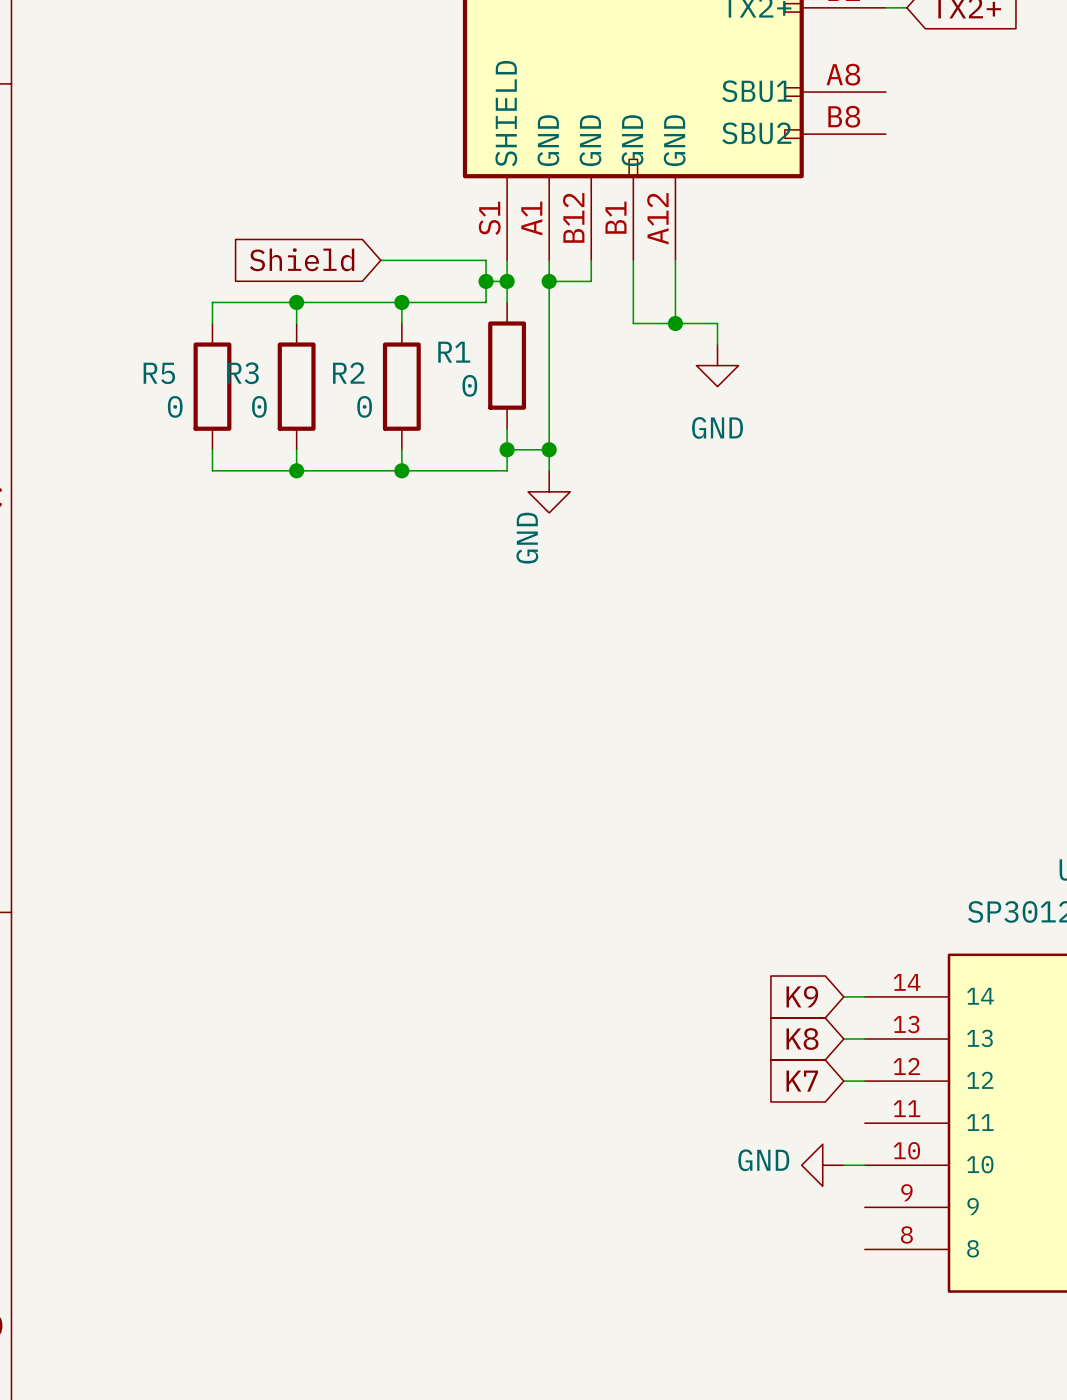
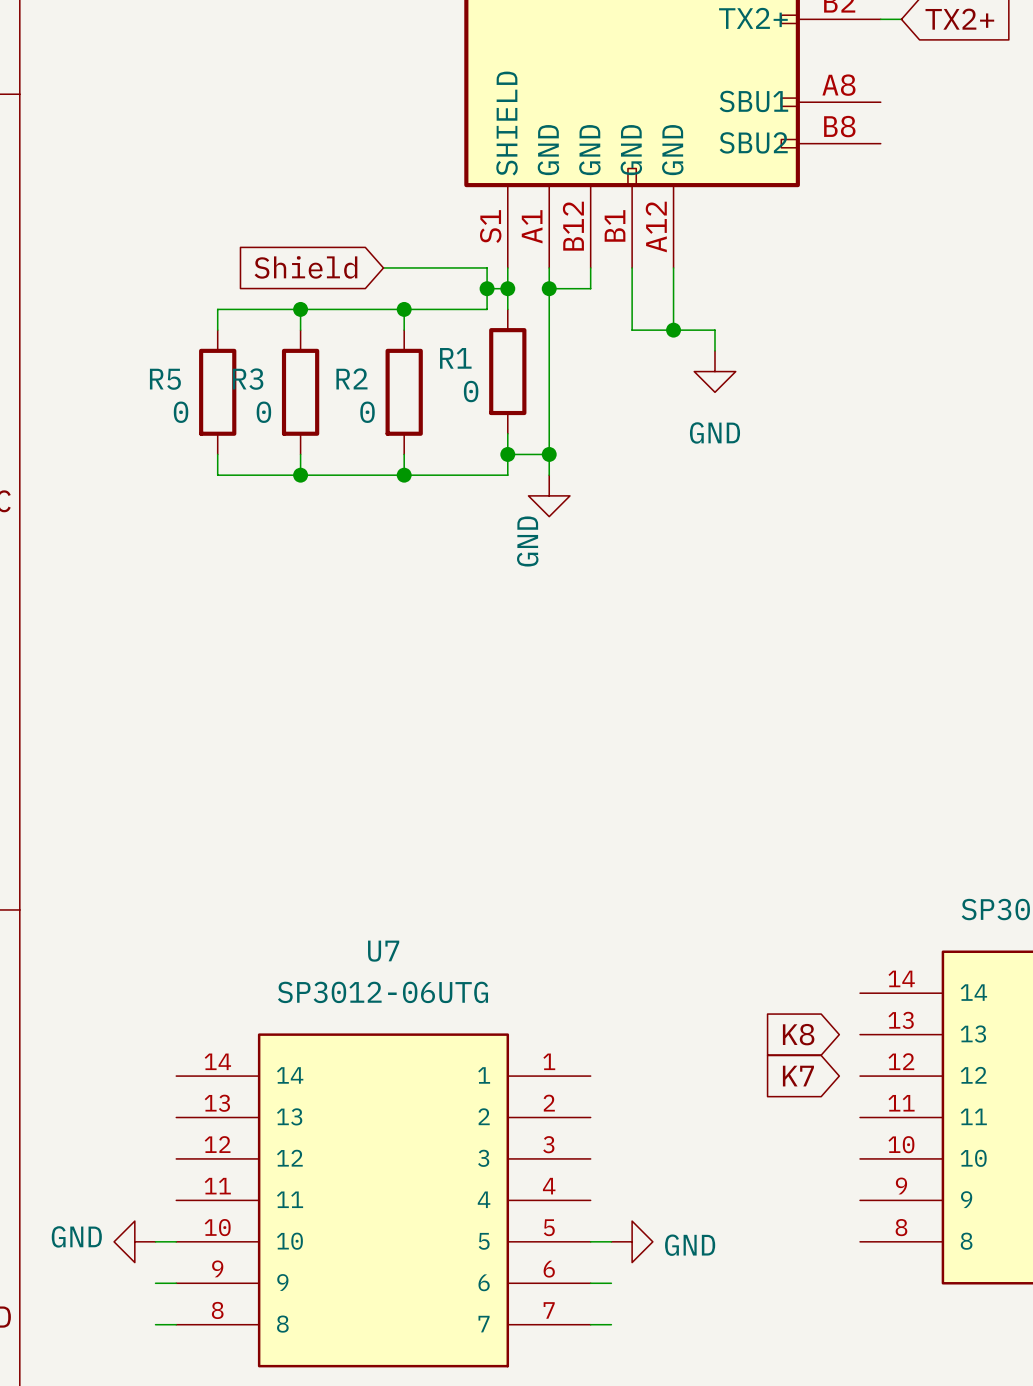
global label: K9 (802, 996) -> none
wire: (843, 996) (864, 996) -> (590, 1241) (611, 1241)
wire: (843, 1038) (864, 1038) -> (590, 1283) (611, 1283)
wire: (843, 1081) (864, 1081) -> (590, 1324) (611, 1324)
power symbol rotation: 0° (822, 1165) -> 180° (632, 1241)
power symbol position: GND (822, 1165) -> GND (632, 1241)
wire: (843, 1165) (864, 1165) -> none
U7: none -> SP3012-06UTG (383, 1200)
power symbol: none -> GND (134, 1241)
wire: none -> (155, 1241) (176, 1241)
wire: none -> (155, 1283) (176, 1283)
wire: none -> (155, 1324) (176, 1324)

